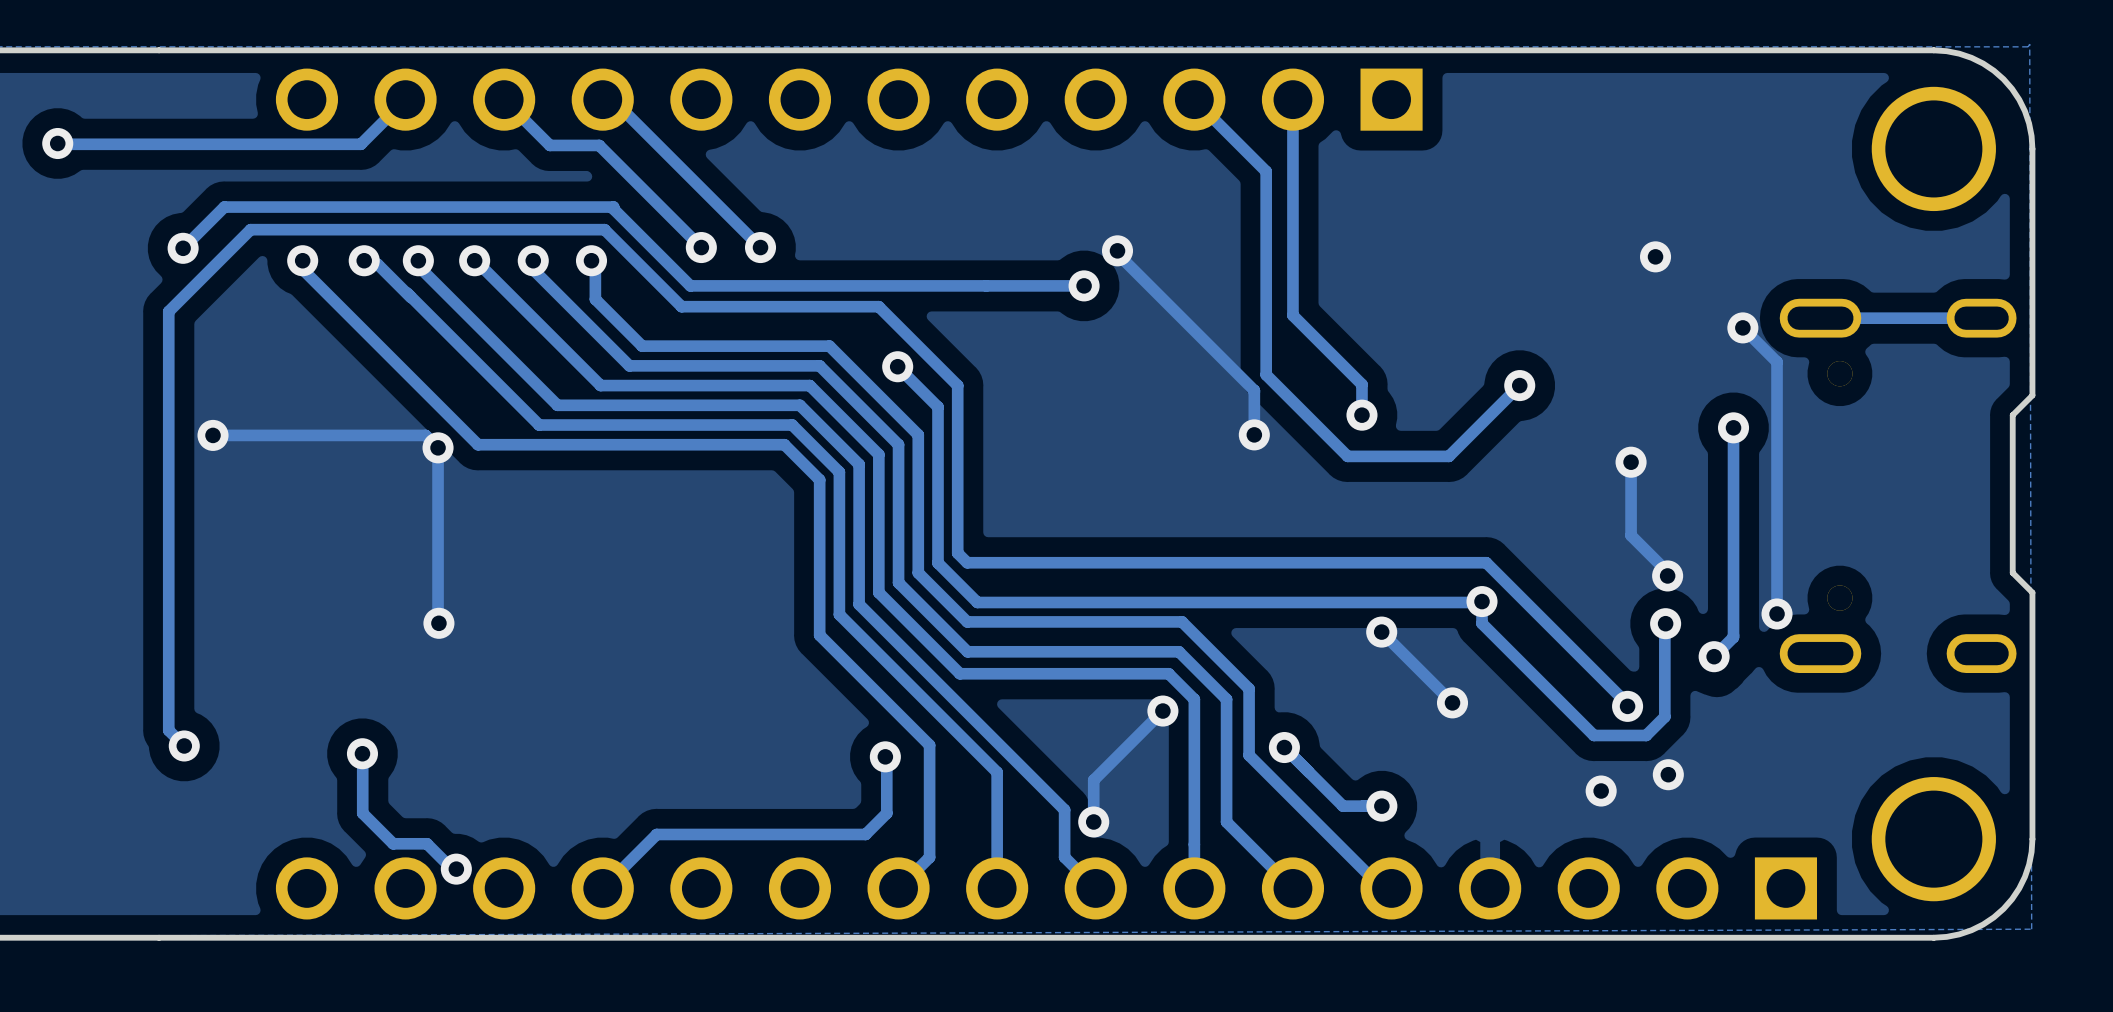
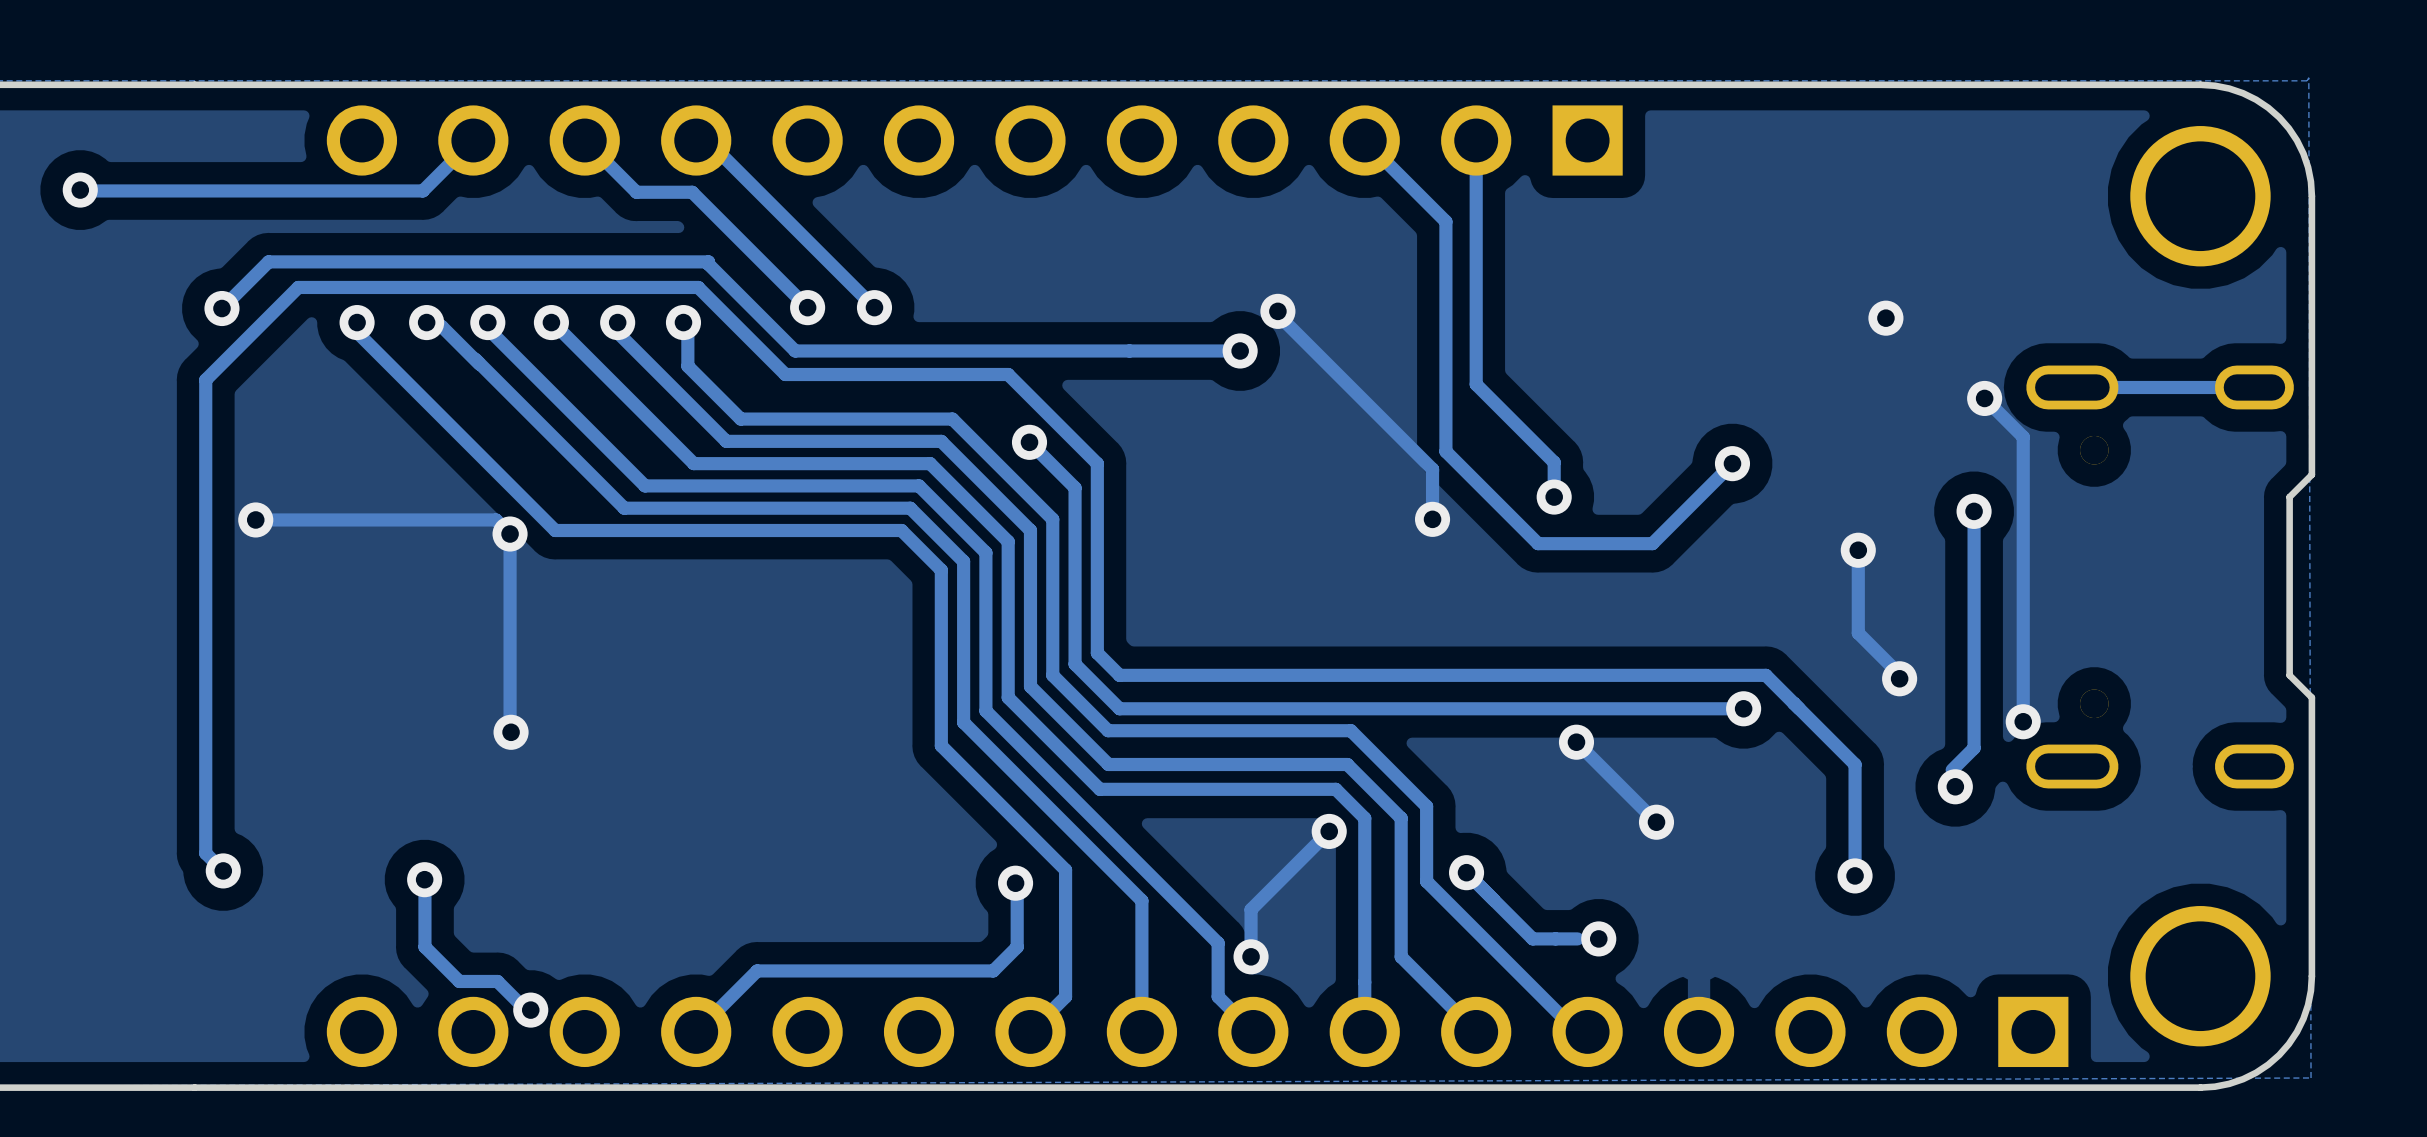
track: (967, 562) (1486, 562) (1628, 704) -> (1108, 663) (1119, 675) (1765, 675) (1855, 764) (1855, 875)
via position: (1482, 601) -> (1743, 708)
track: (1481, 602) (1482, 623) (1593, 735) (1646, 735) (1664, 716) (1665, 623) -> (1688, 708) (1743, 708)
via: (1665, 623) -> none
via position: (1714, 656) -> (1955, 786)
via: (1627, 706) -> none
via: none -> (1855, 875)
via: (1668, 774) -> none
via: (1601, 791) -> none
via position: (1381, 806) -> (1598, 938)

